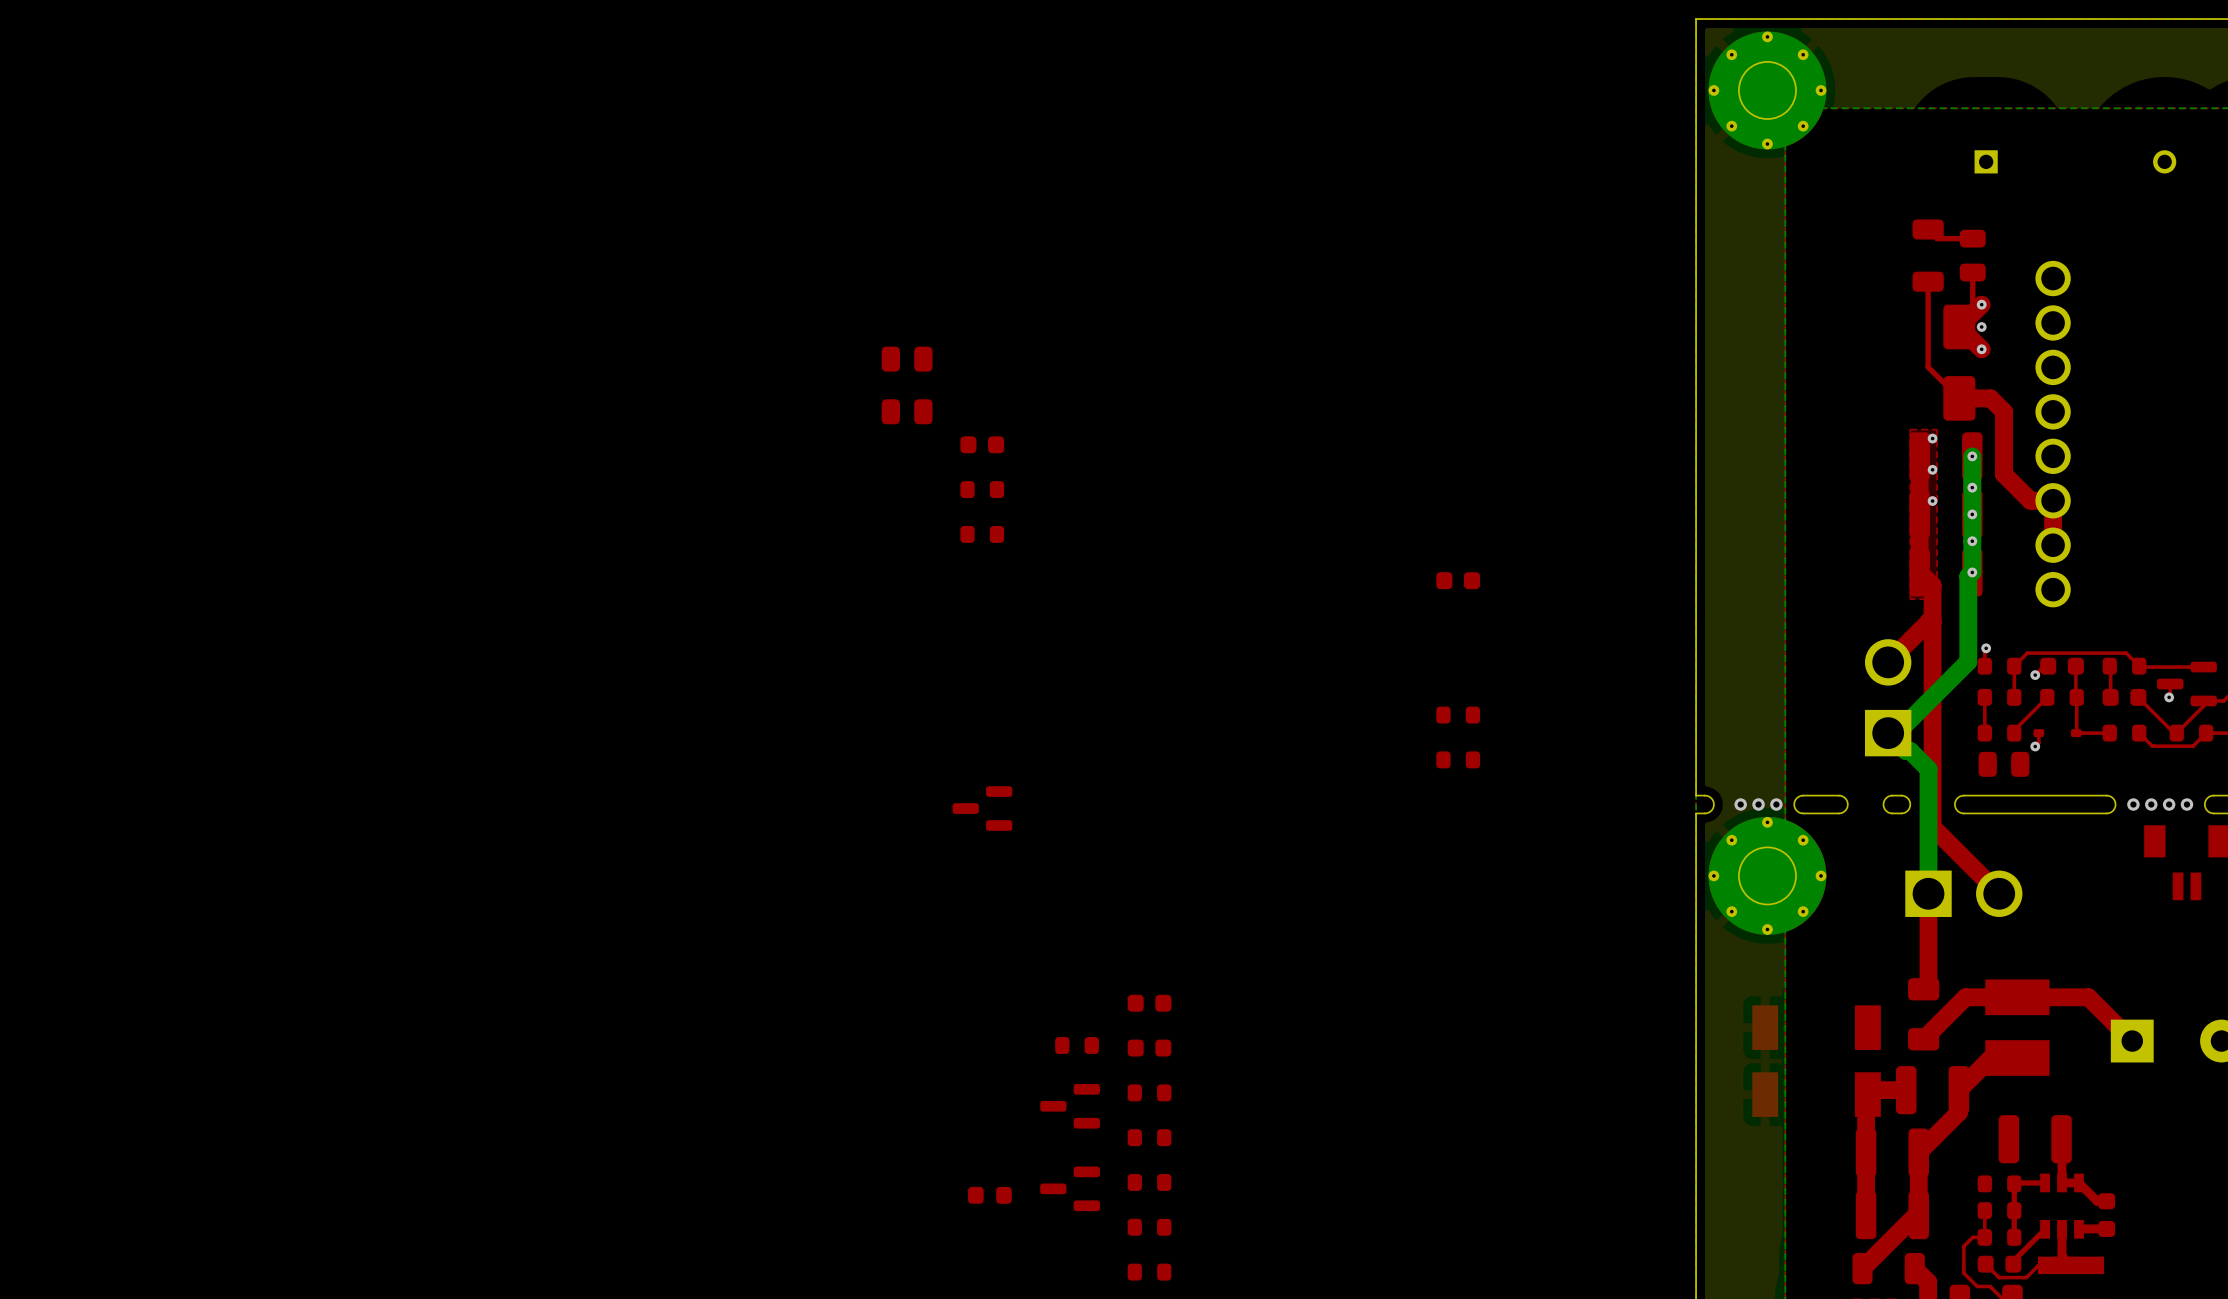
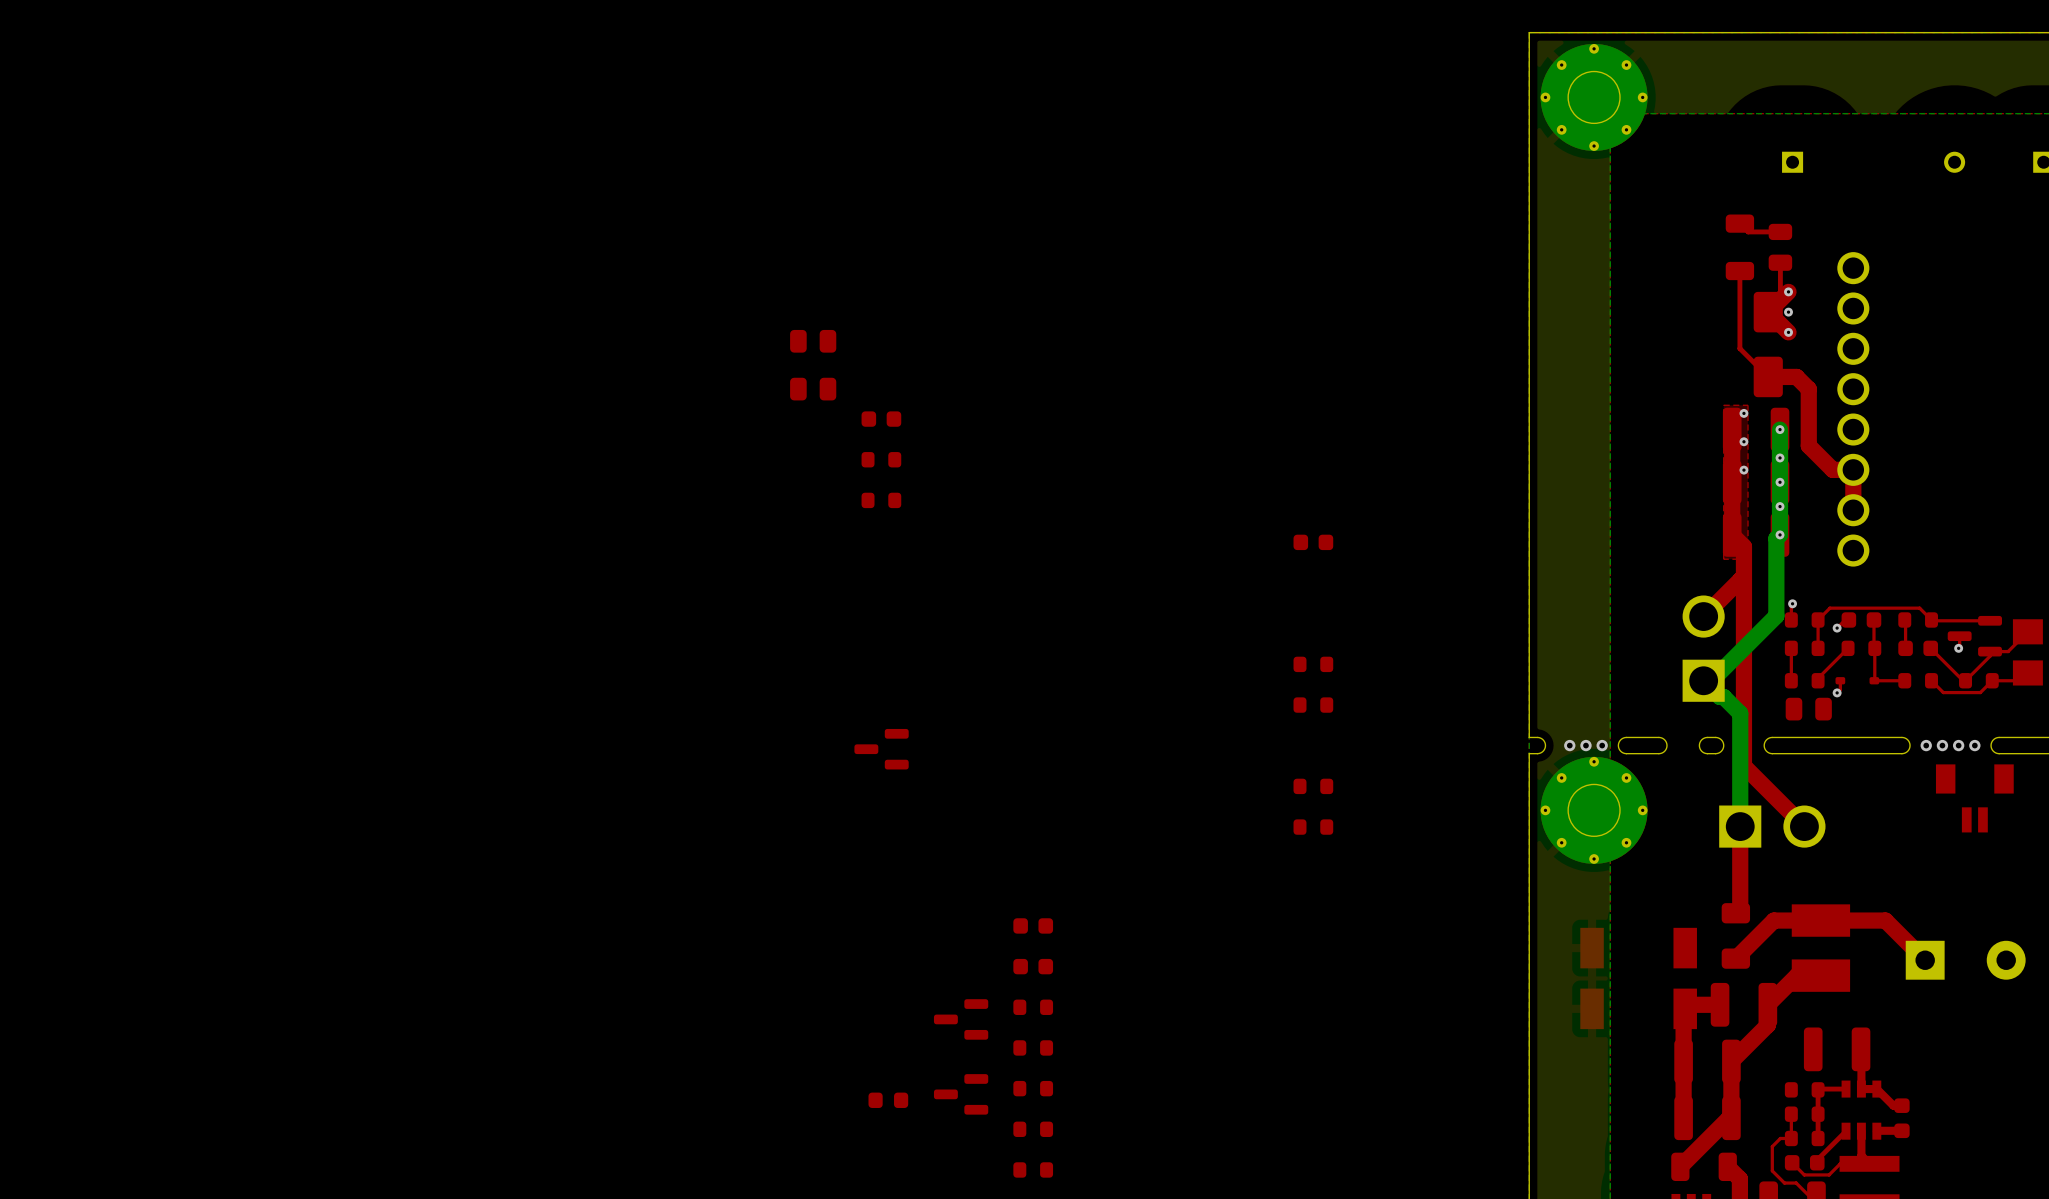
part: none -> (1313, 786)
part: none -> (1313, 827)
part: (1077, 1045) -> none

